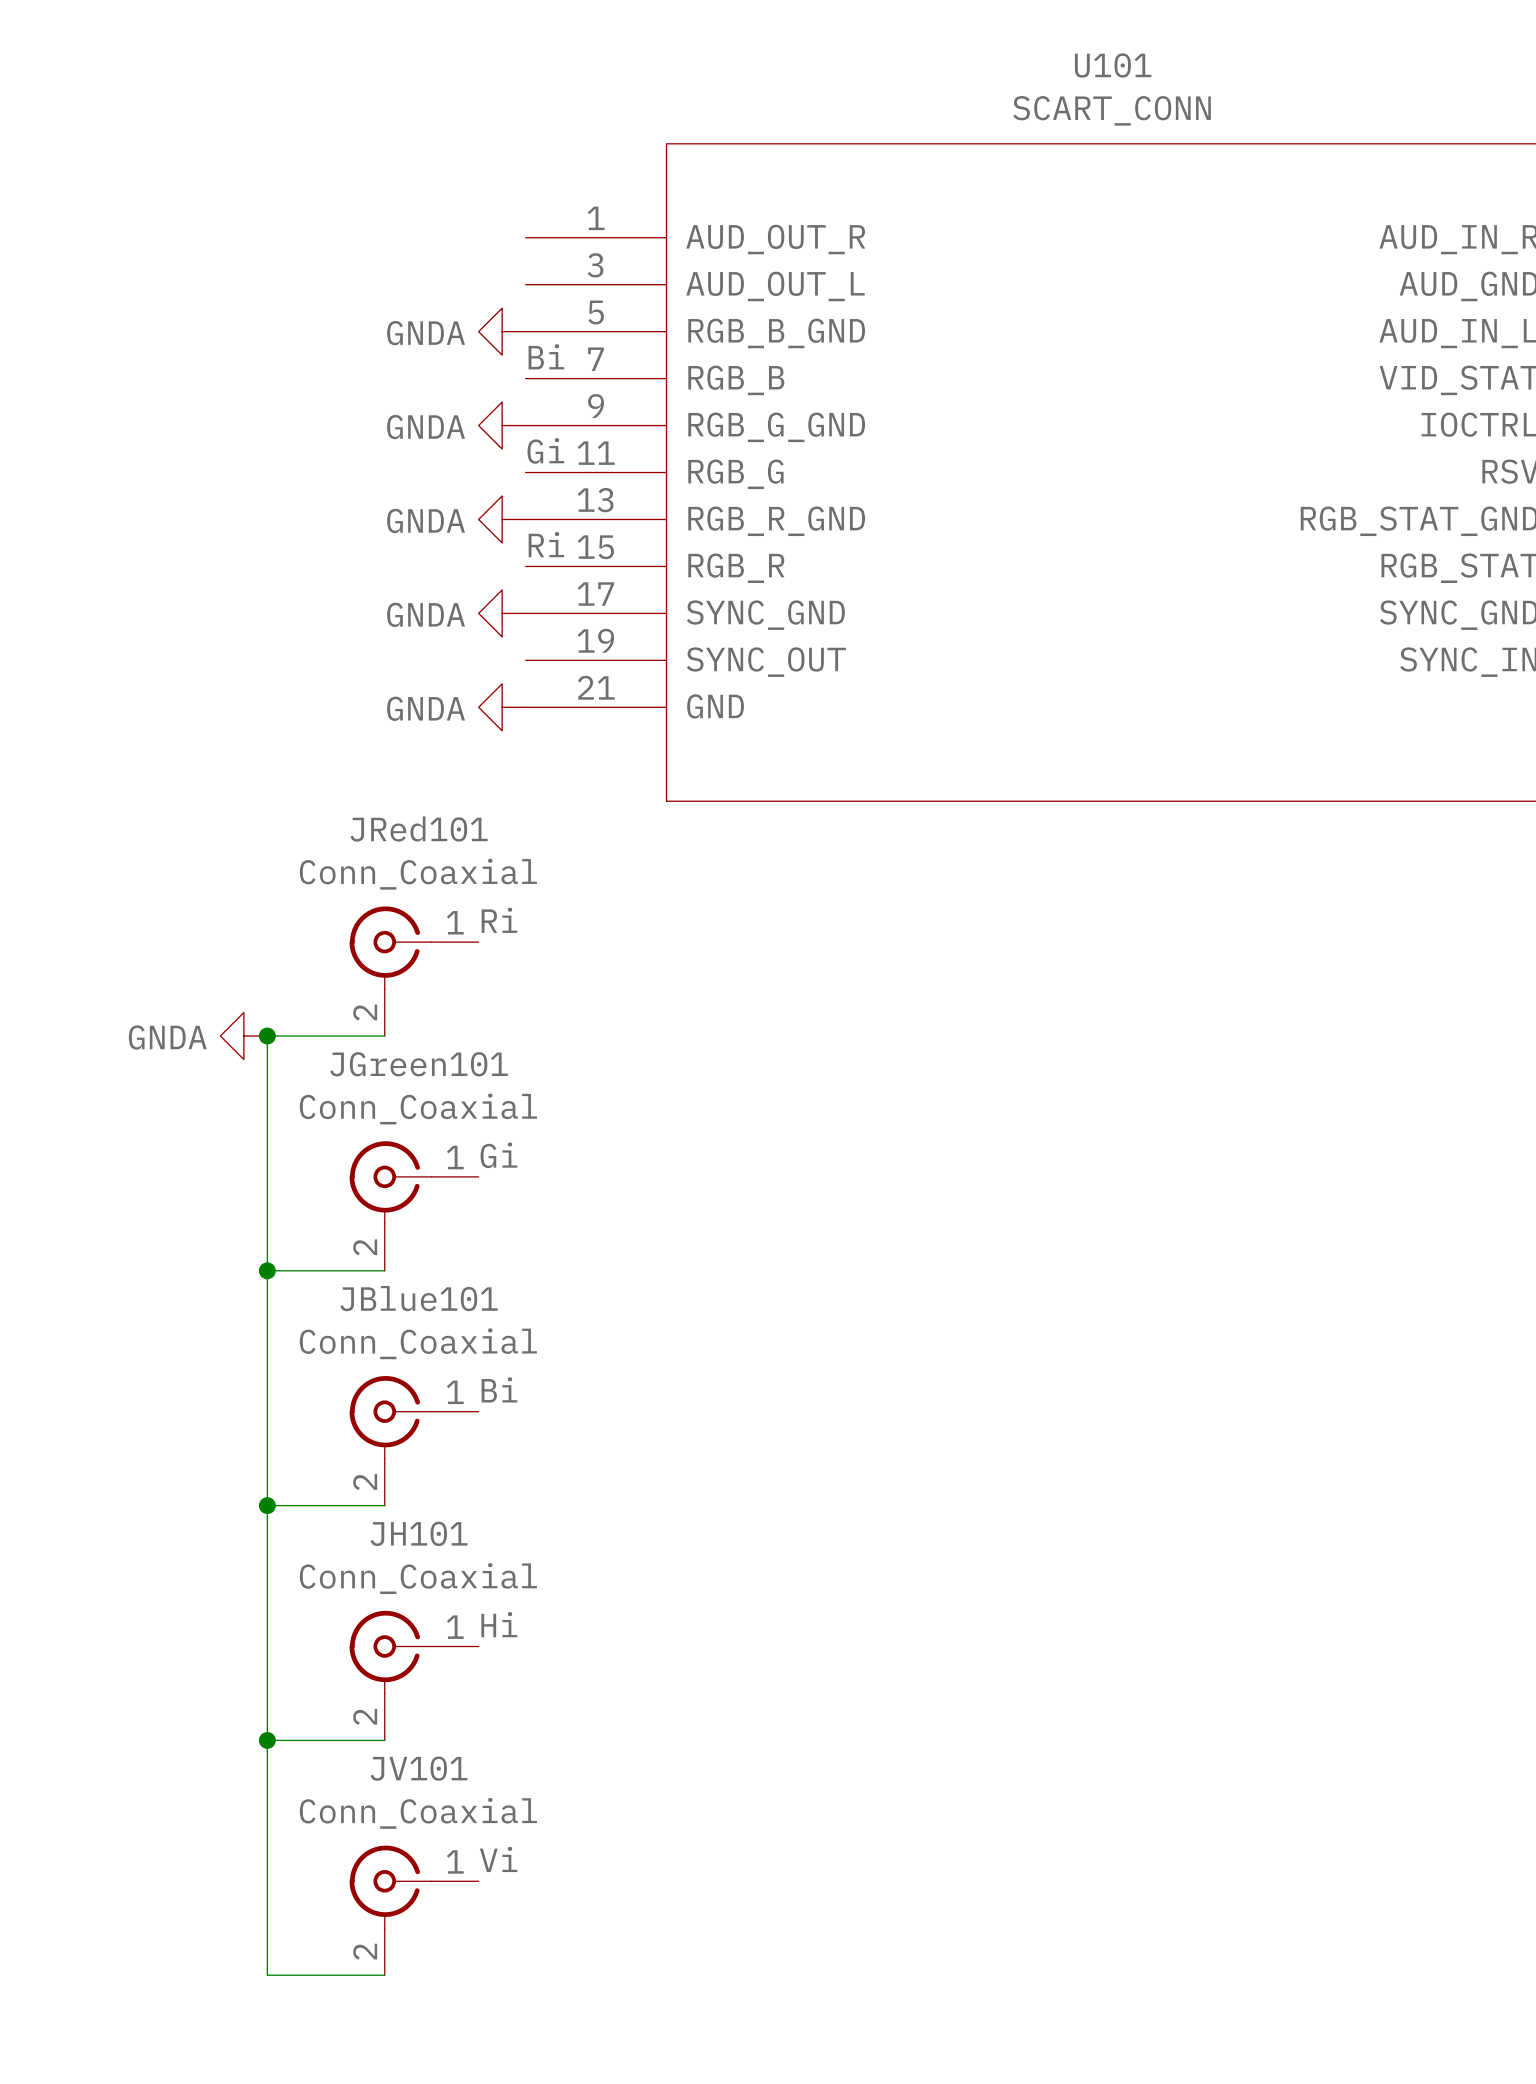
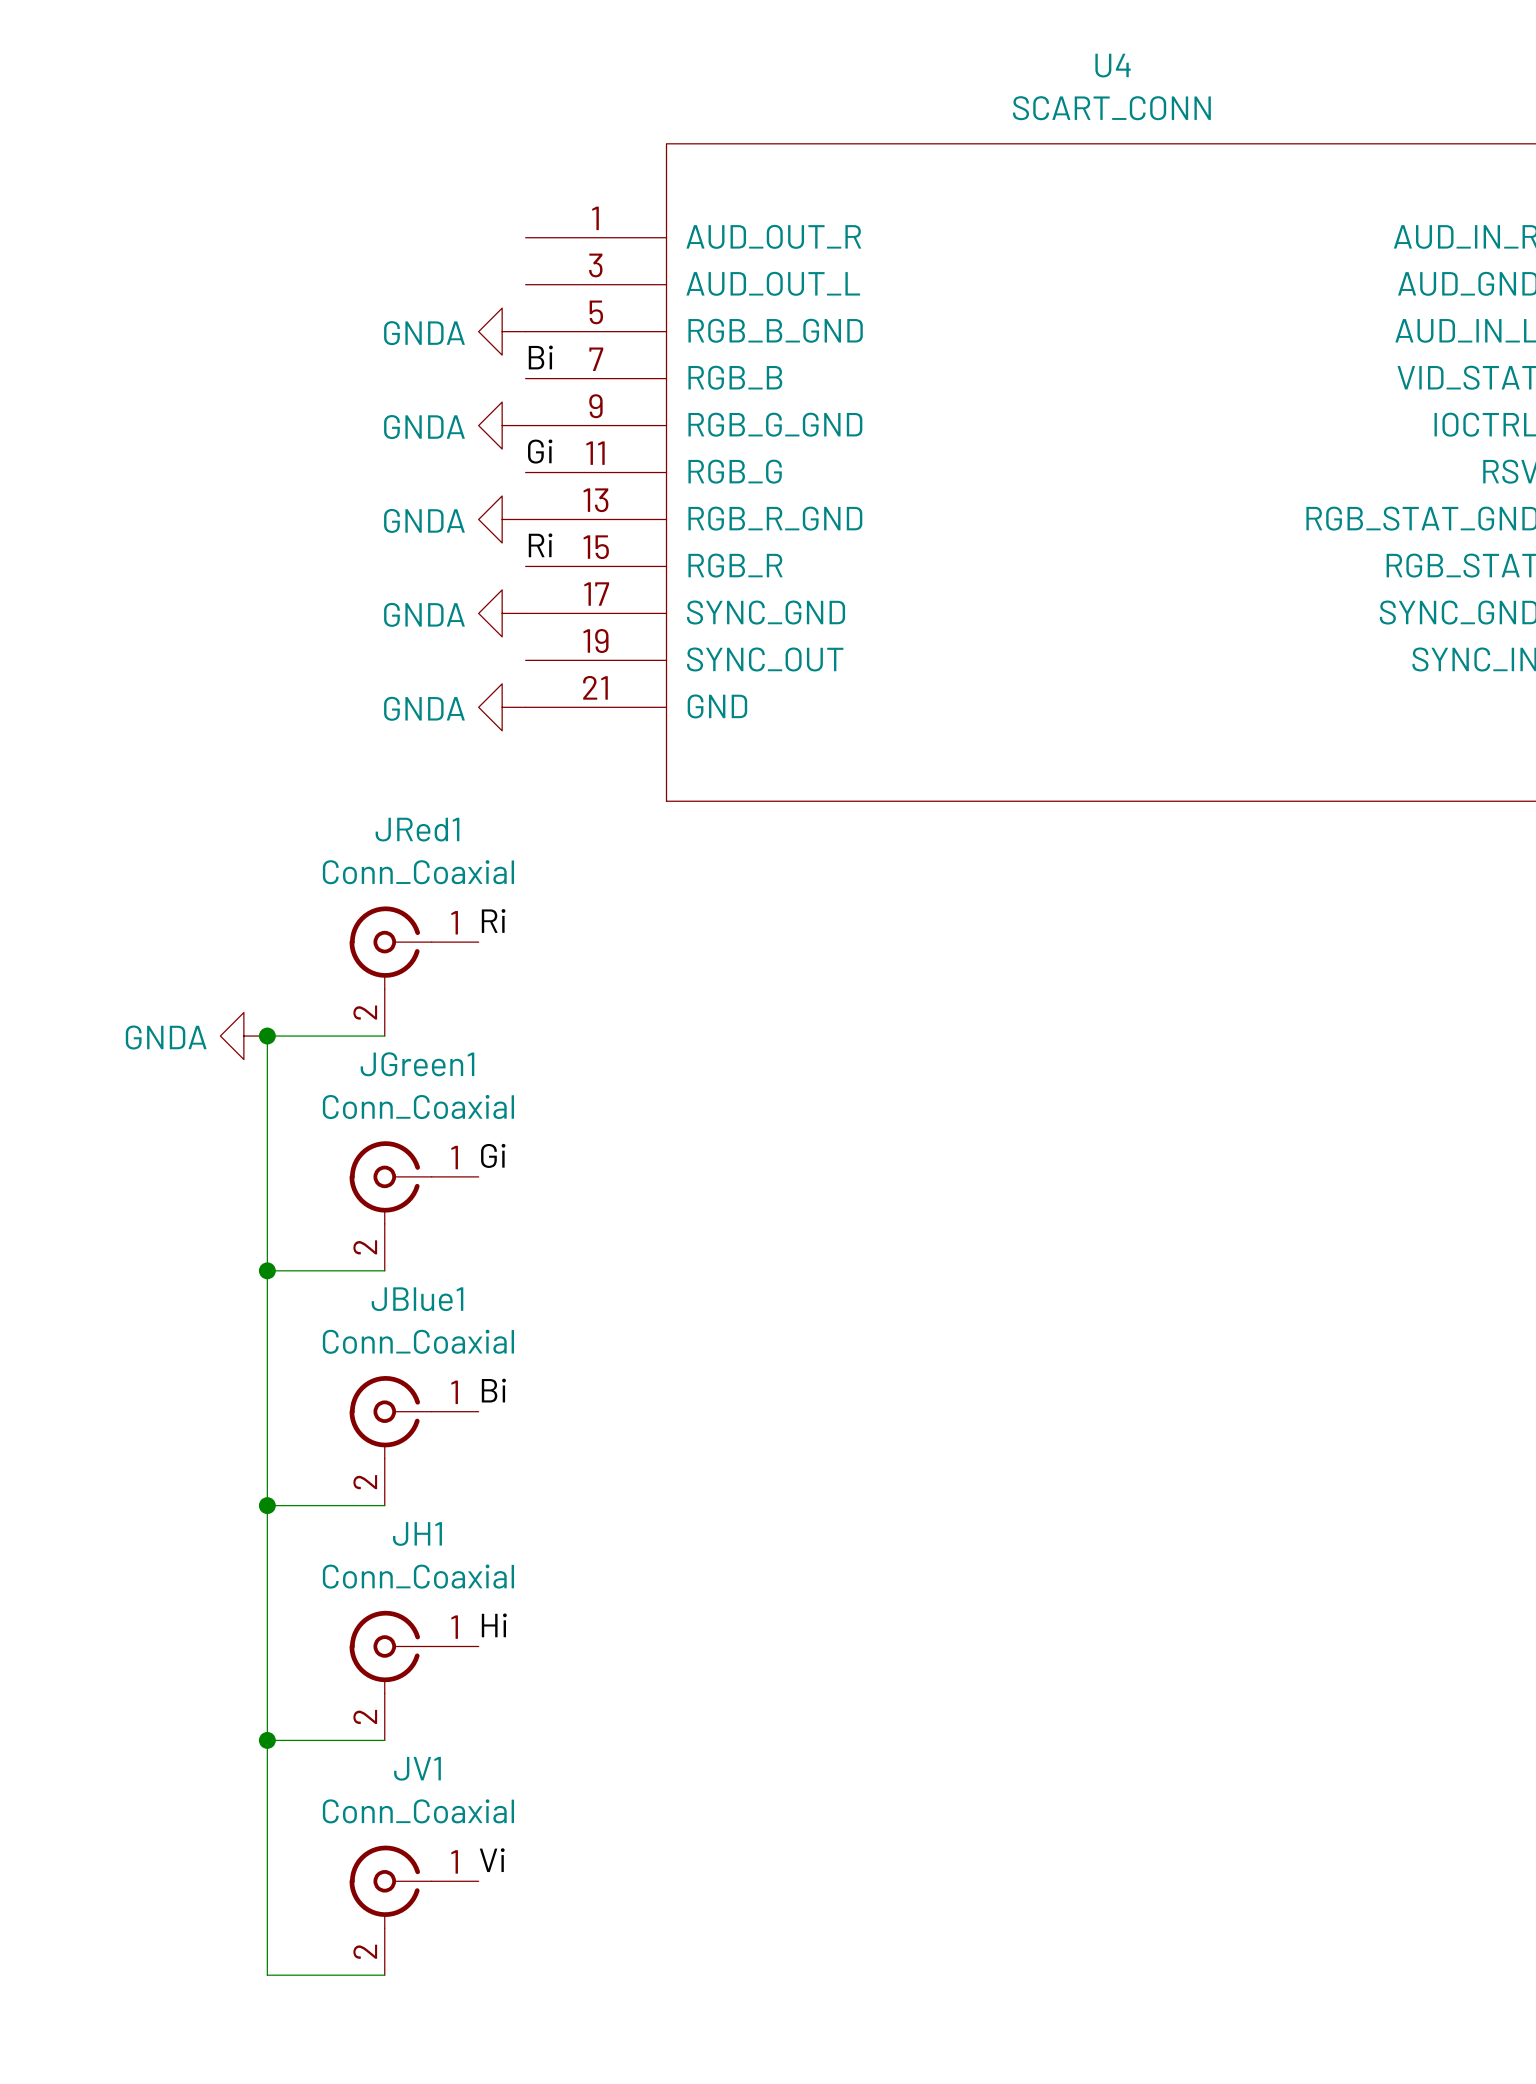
U101 name: U101 (1113, 65) -> U4 (1113, 65)
JRed101 name: JRed101 (419, 828) -> JRed1 (417, 829)
JGreen101 name: JGreen101 (419, 1064) -> JGreen1 (417, 1064)
JBlue101 name: JBlue101 (419, 1298) -> JBlue1 (417, 1299)
JH101 name: JH101 (419, 1533) -> JH1 (417, 1533)
JV101 name: JV101 (419, 1768) -> JV1 (417, 1768)

